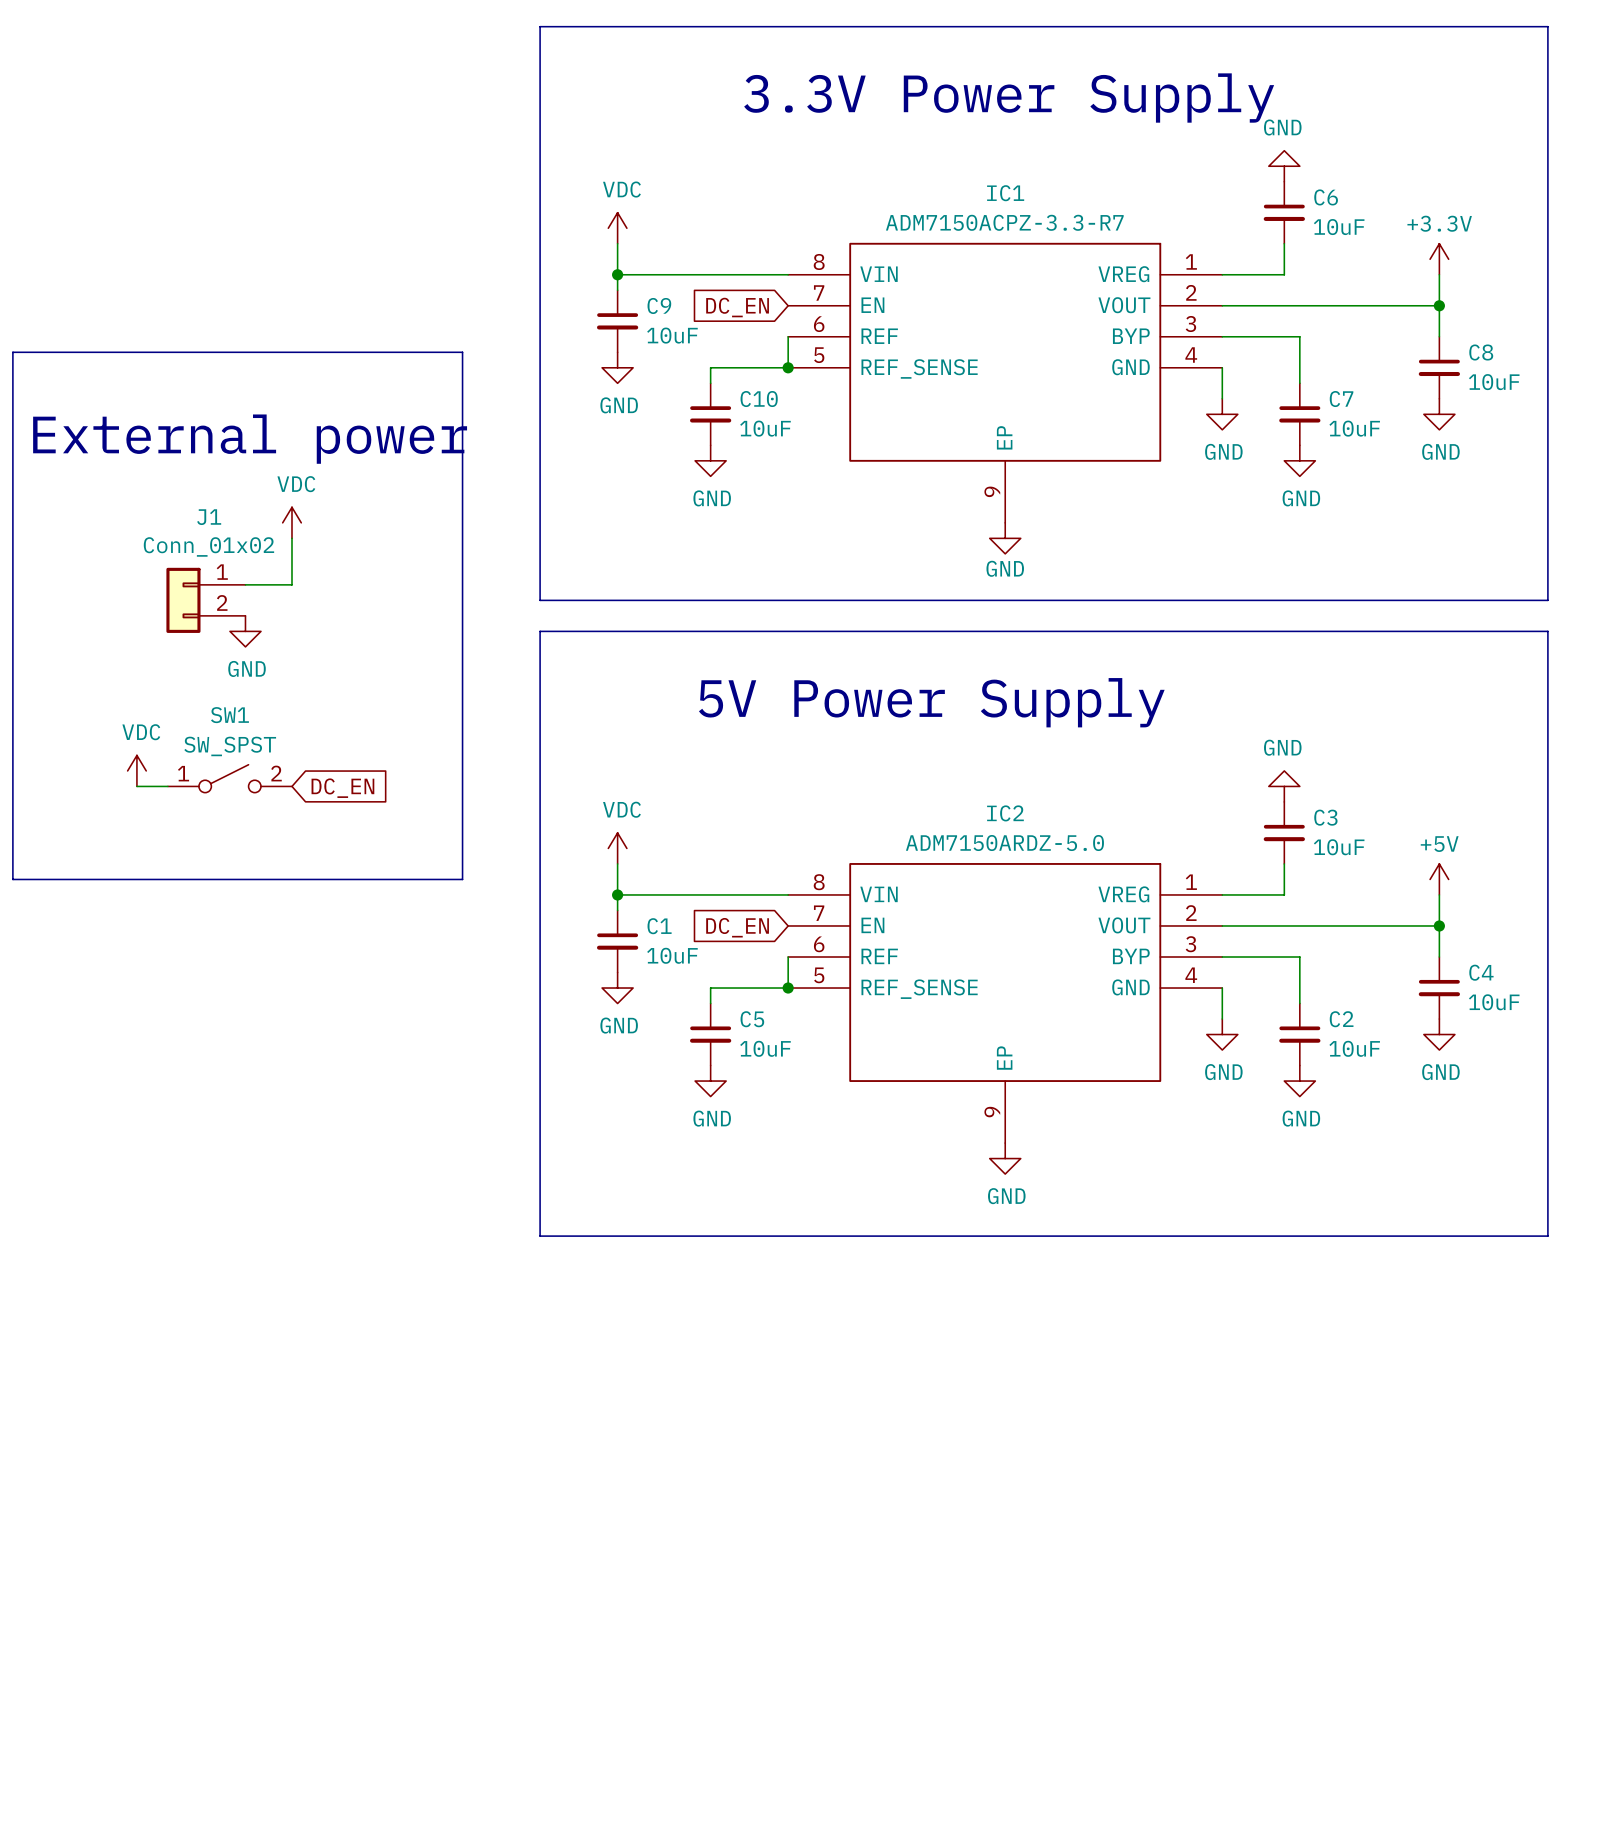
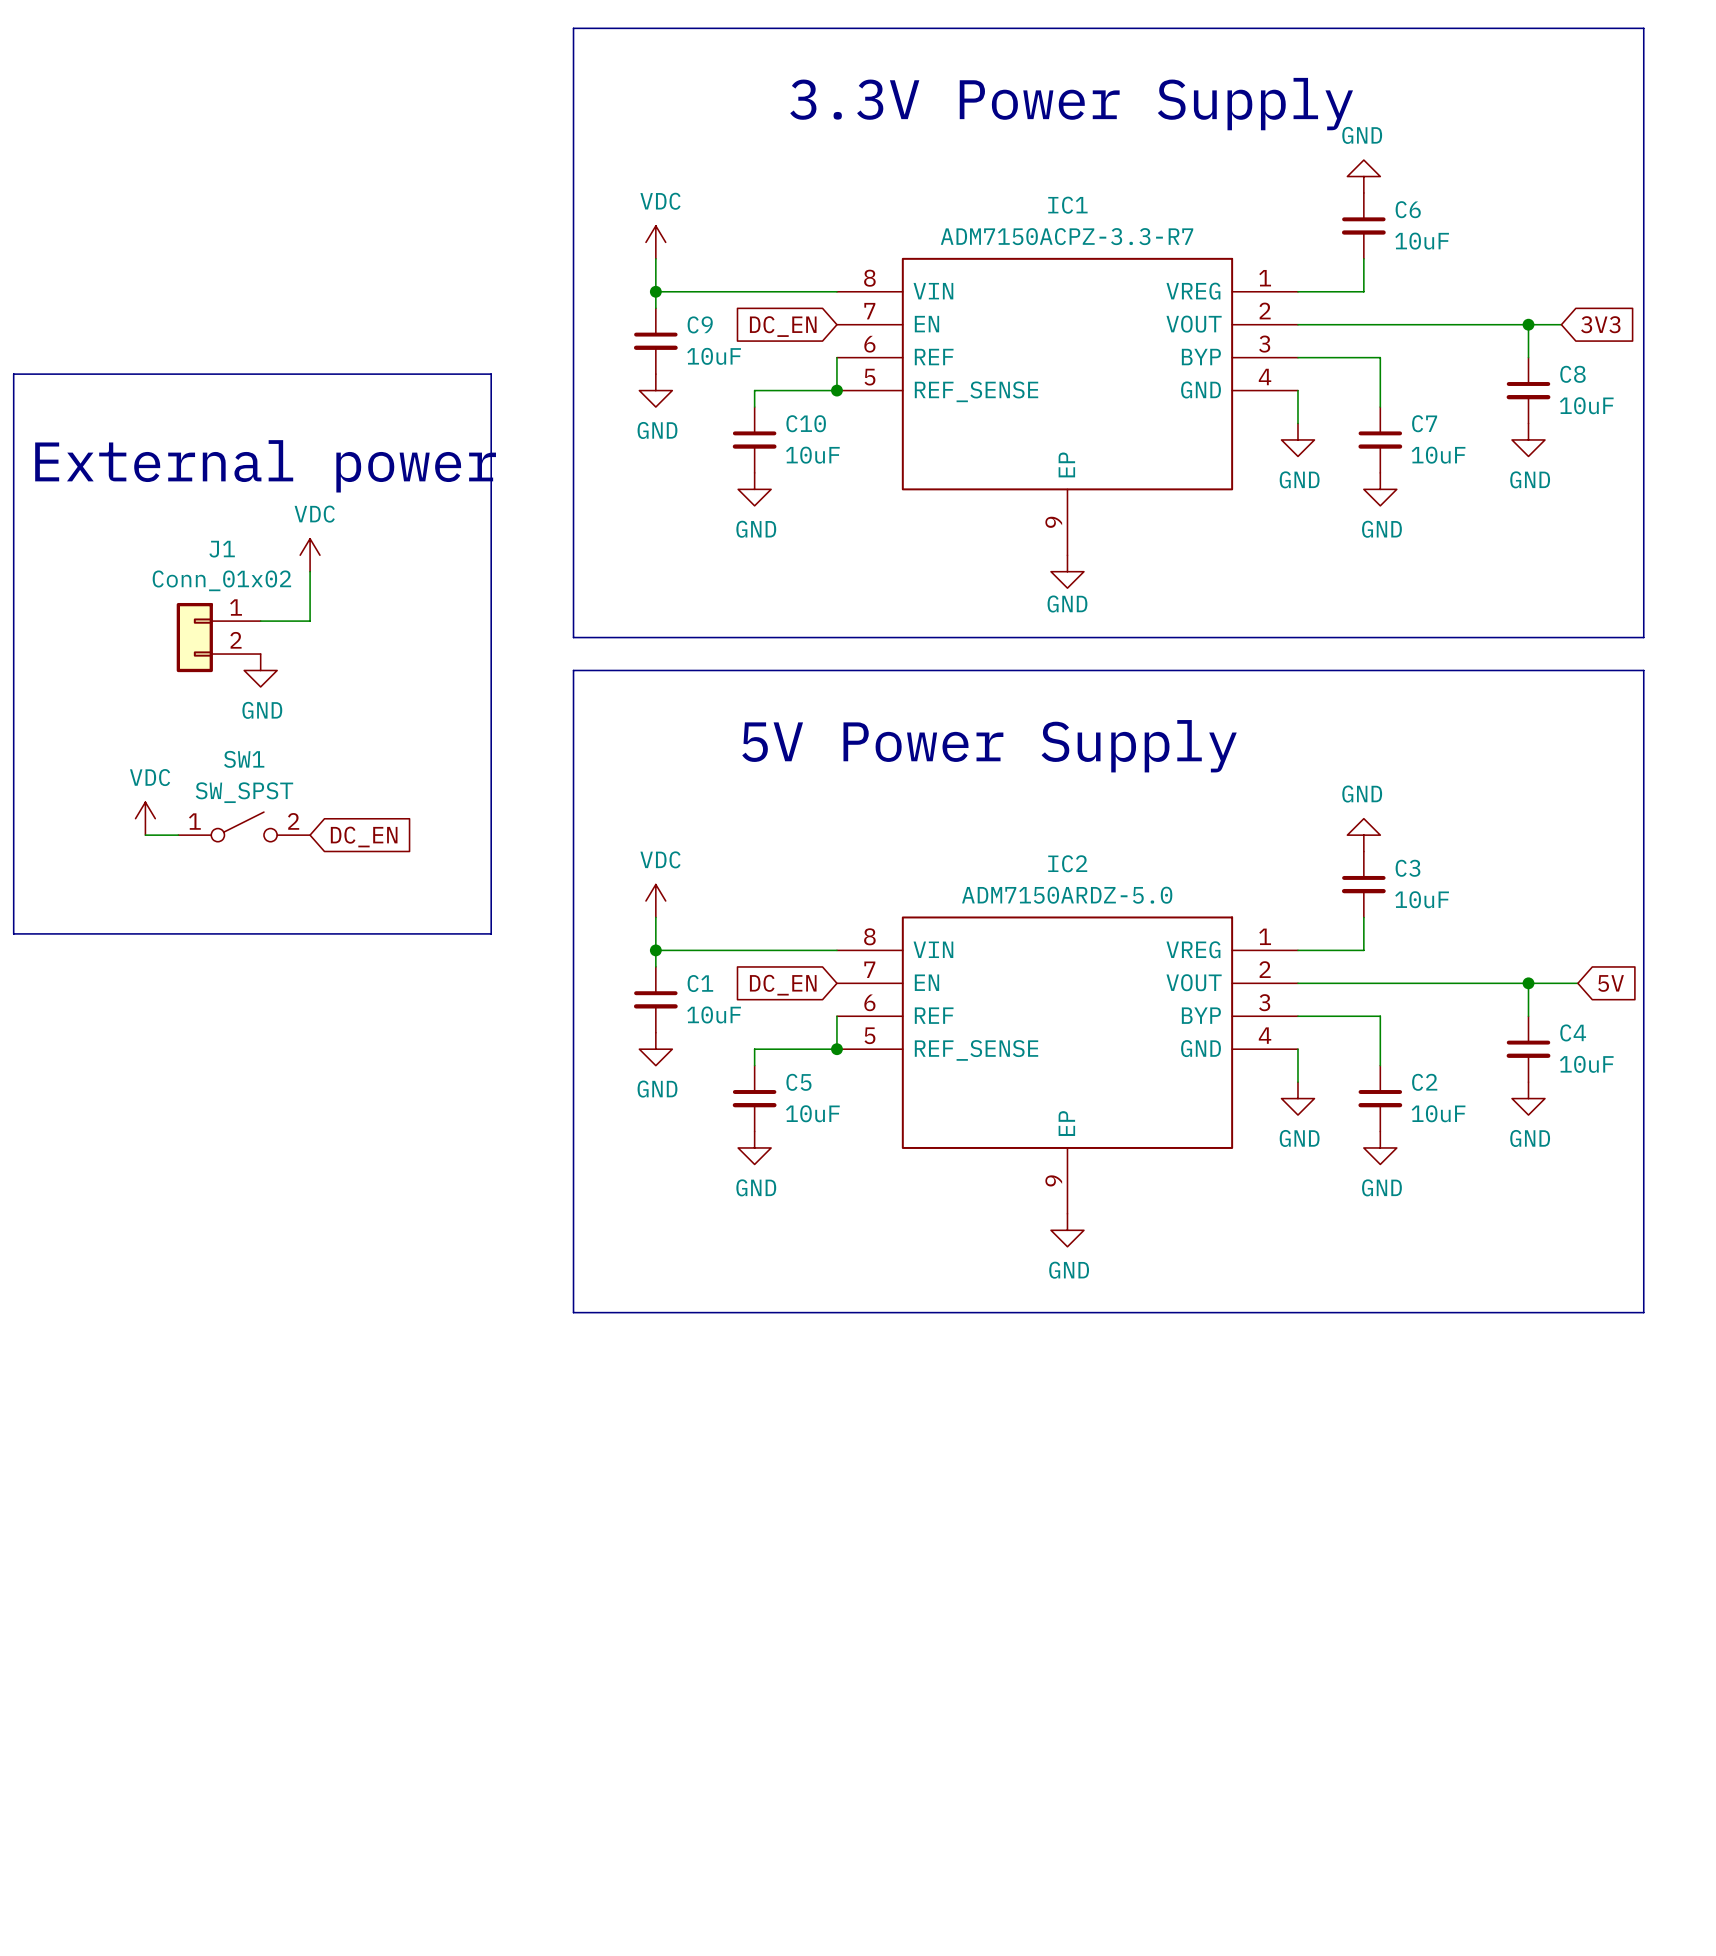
power symbol: +3.3V (1439, 259) -> none
wire: (1439, 274) (1439, 305) -> (1561, 324) (1528, 324)
global label: none -> 3V3 (1600, 324)
power symbol: +5V (1439, 879) -> none
wire: (1439, 894) (1439, 925) -> (1577, 983) (1528, 983)
global label: none -> 5V (1611, 983)

